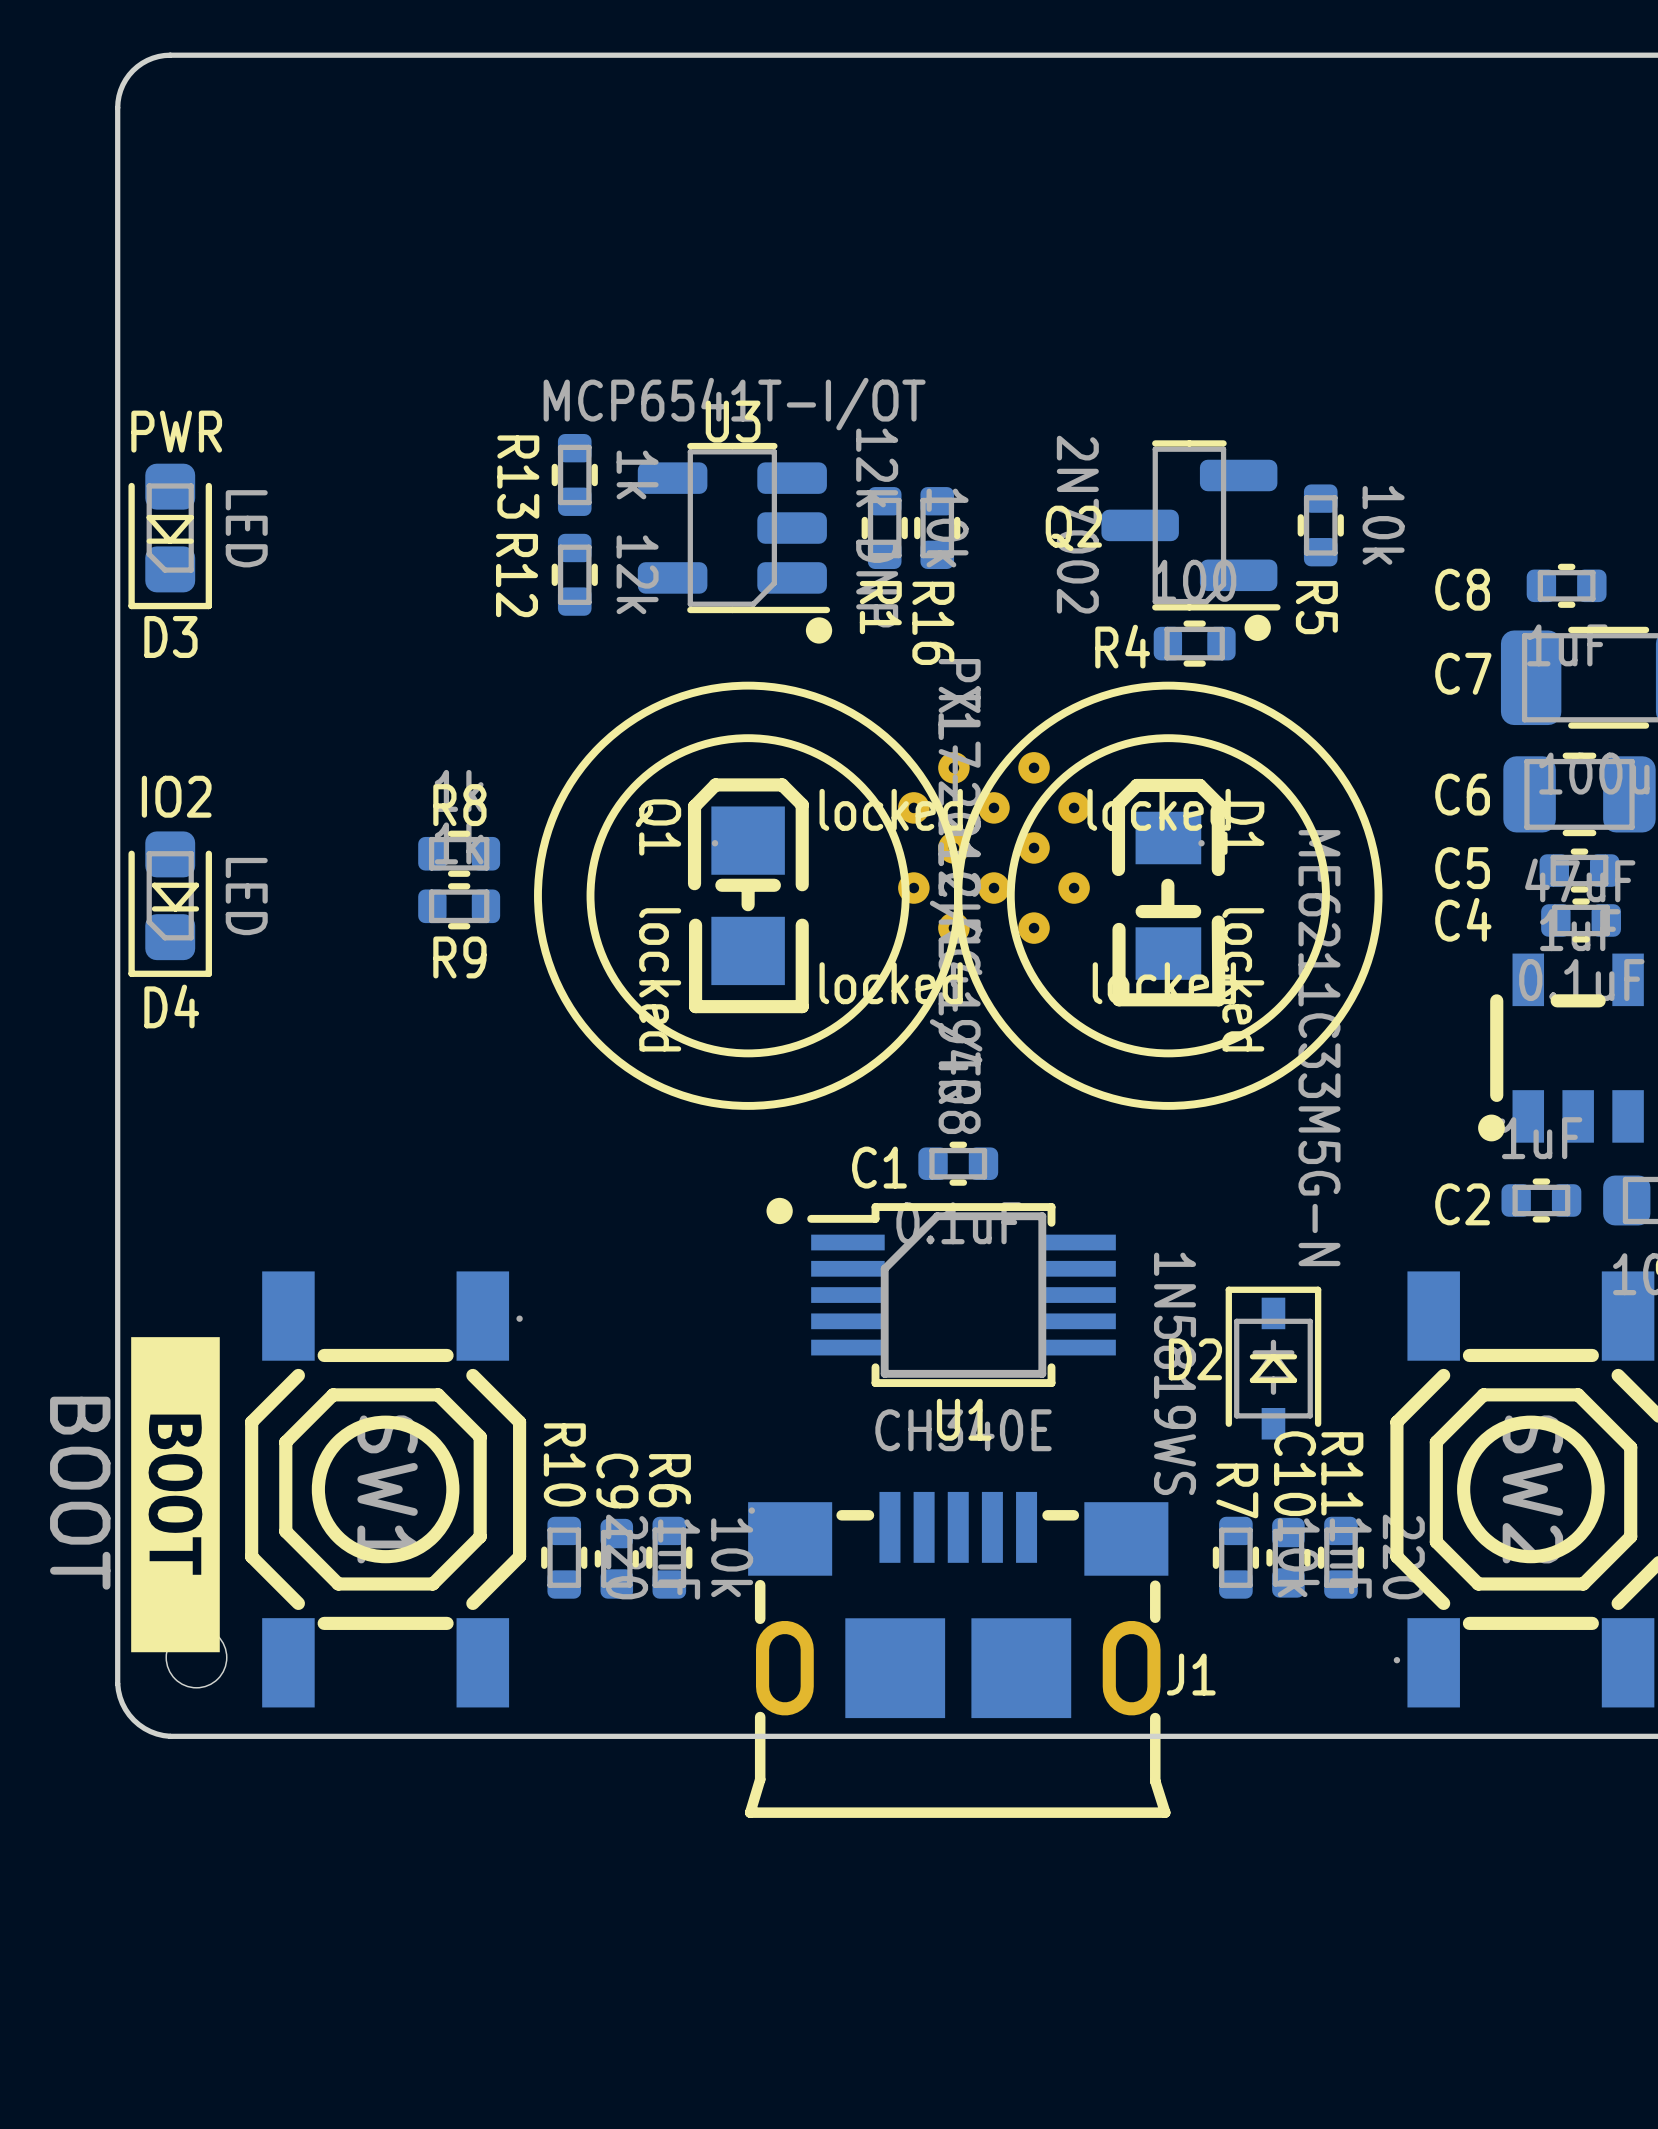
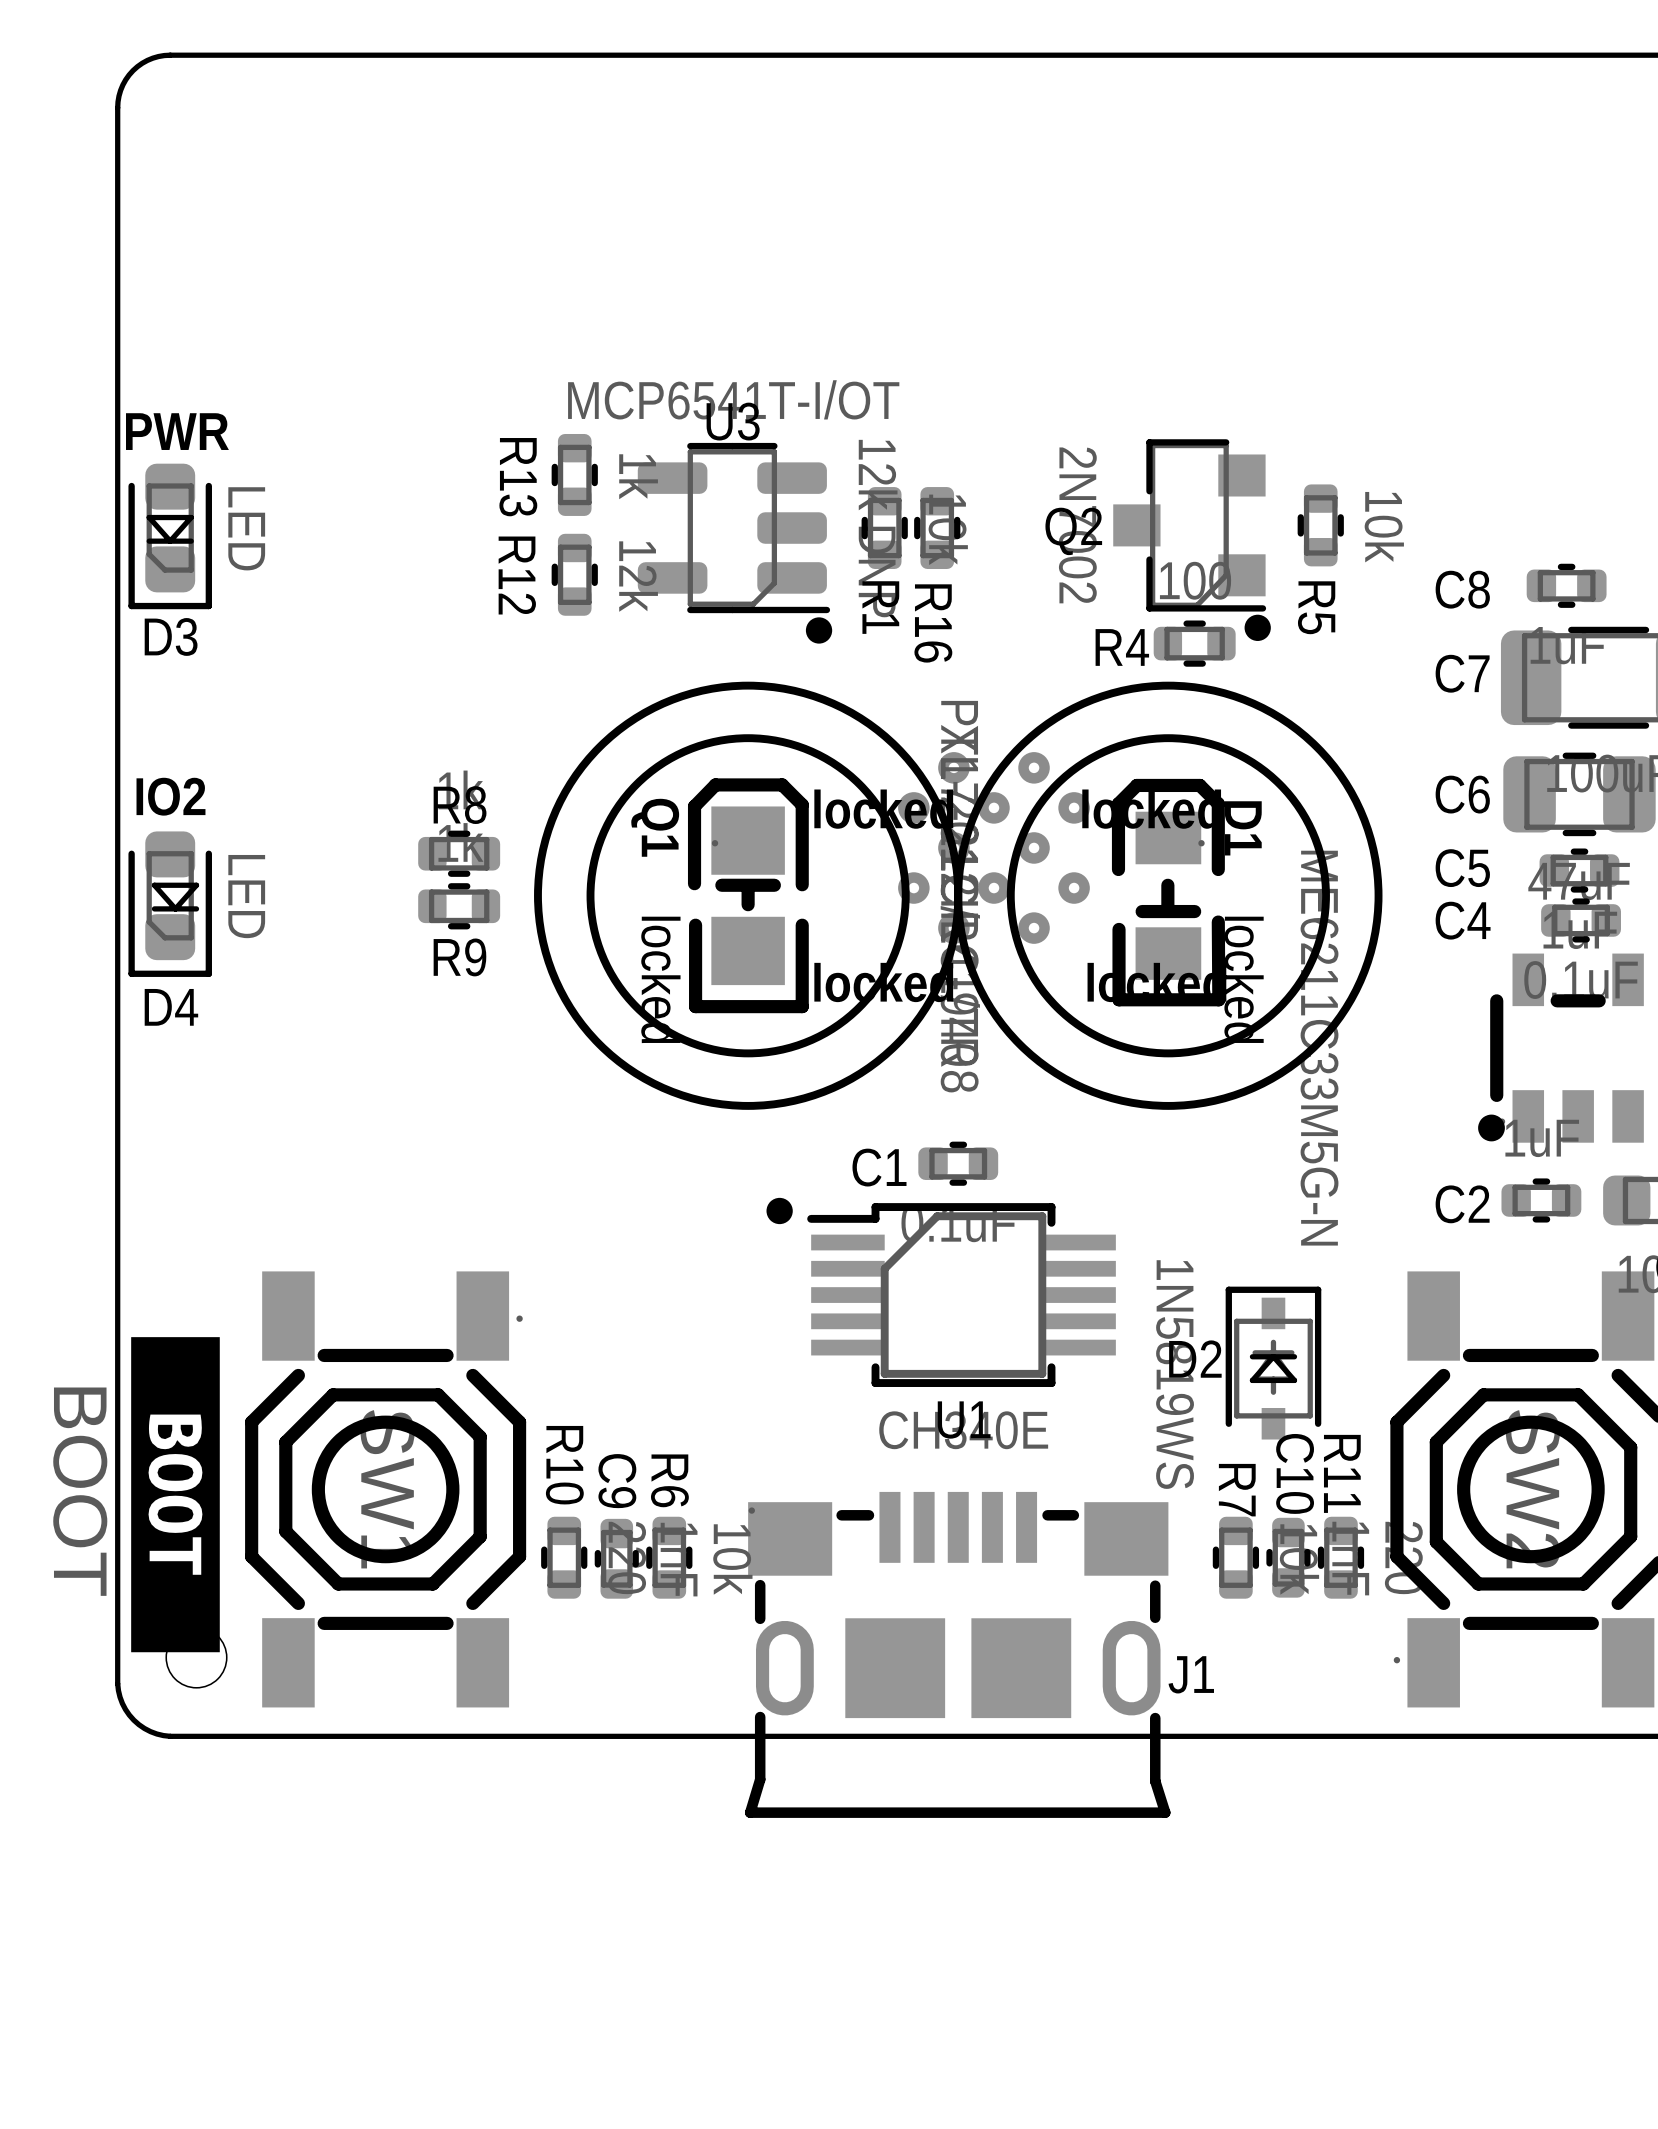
Q2 footprint: [1101, 440, 1281, 611] -> [1113, 439, 1267, 612]

